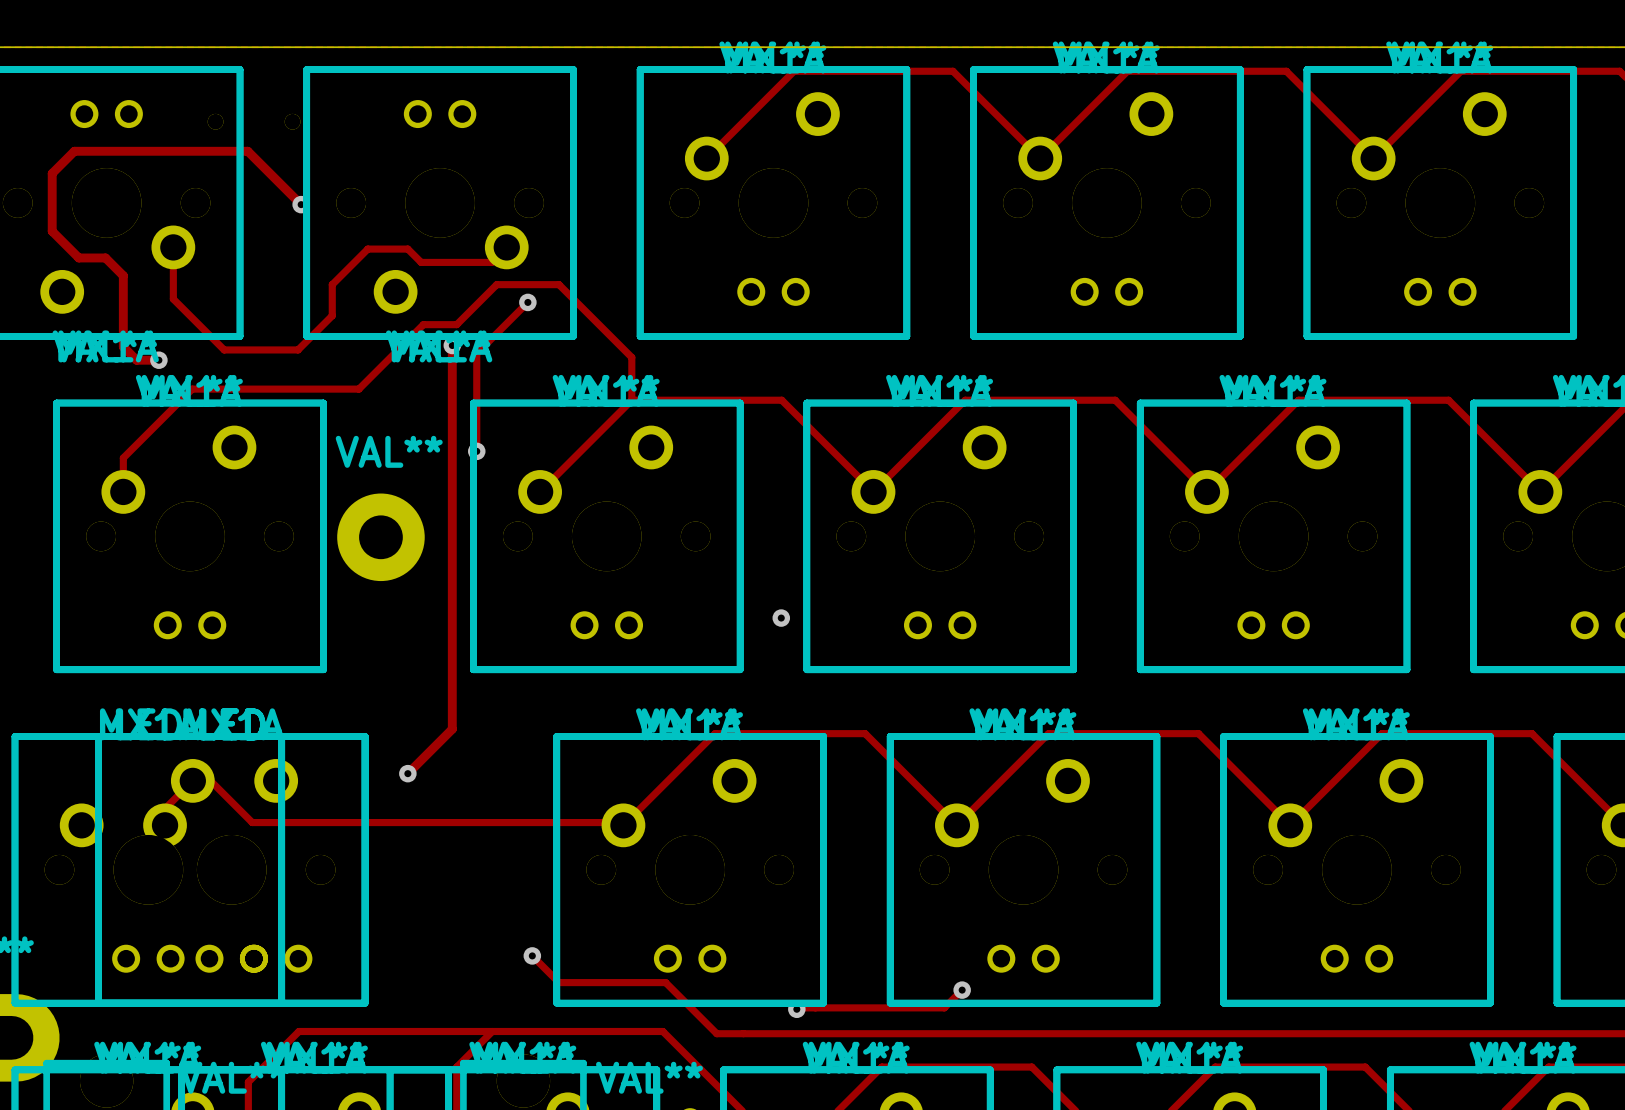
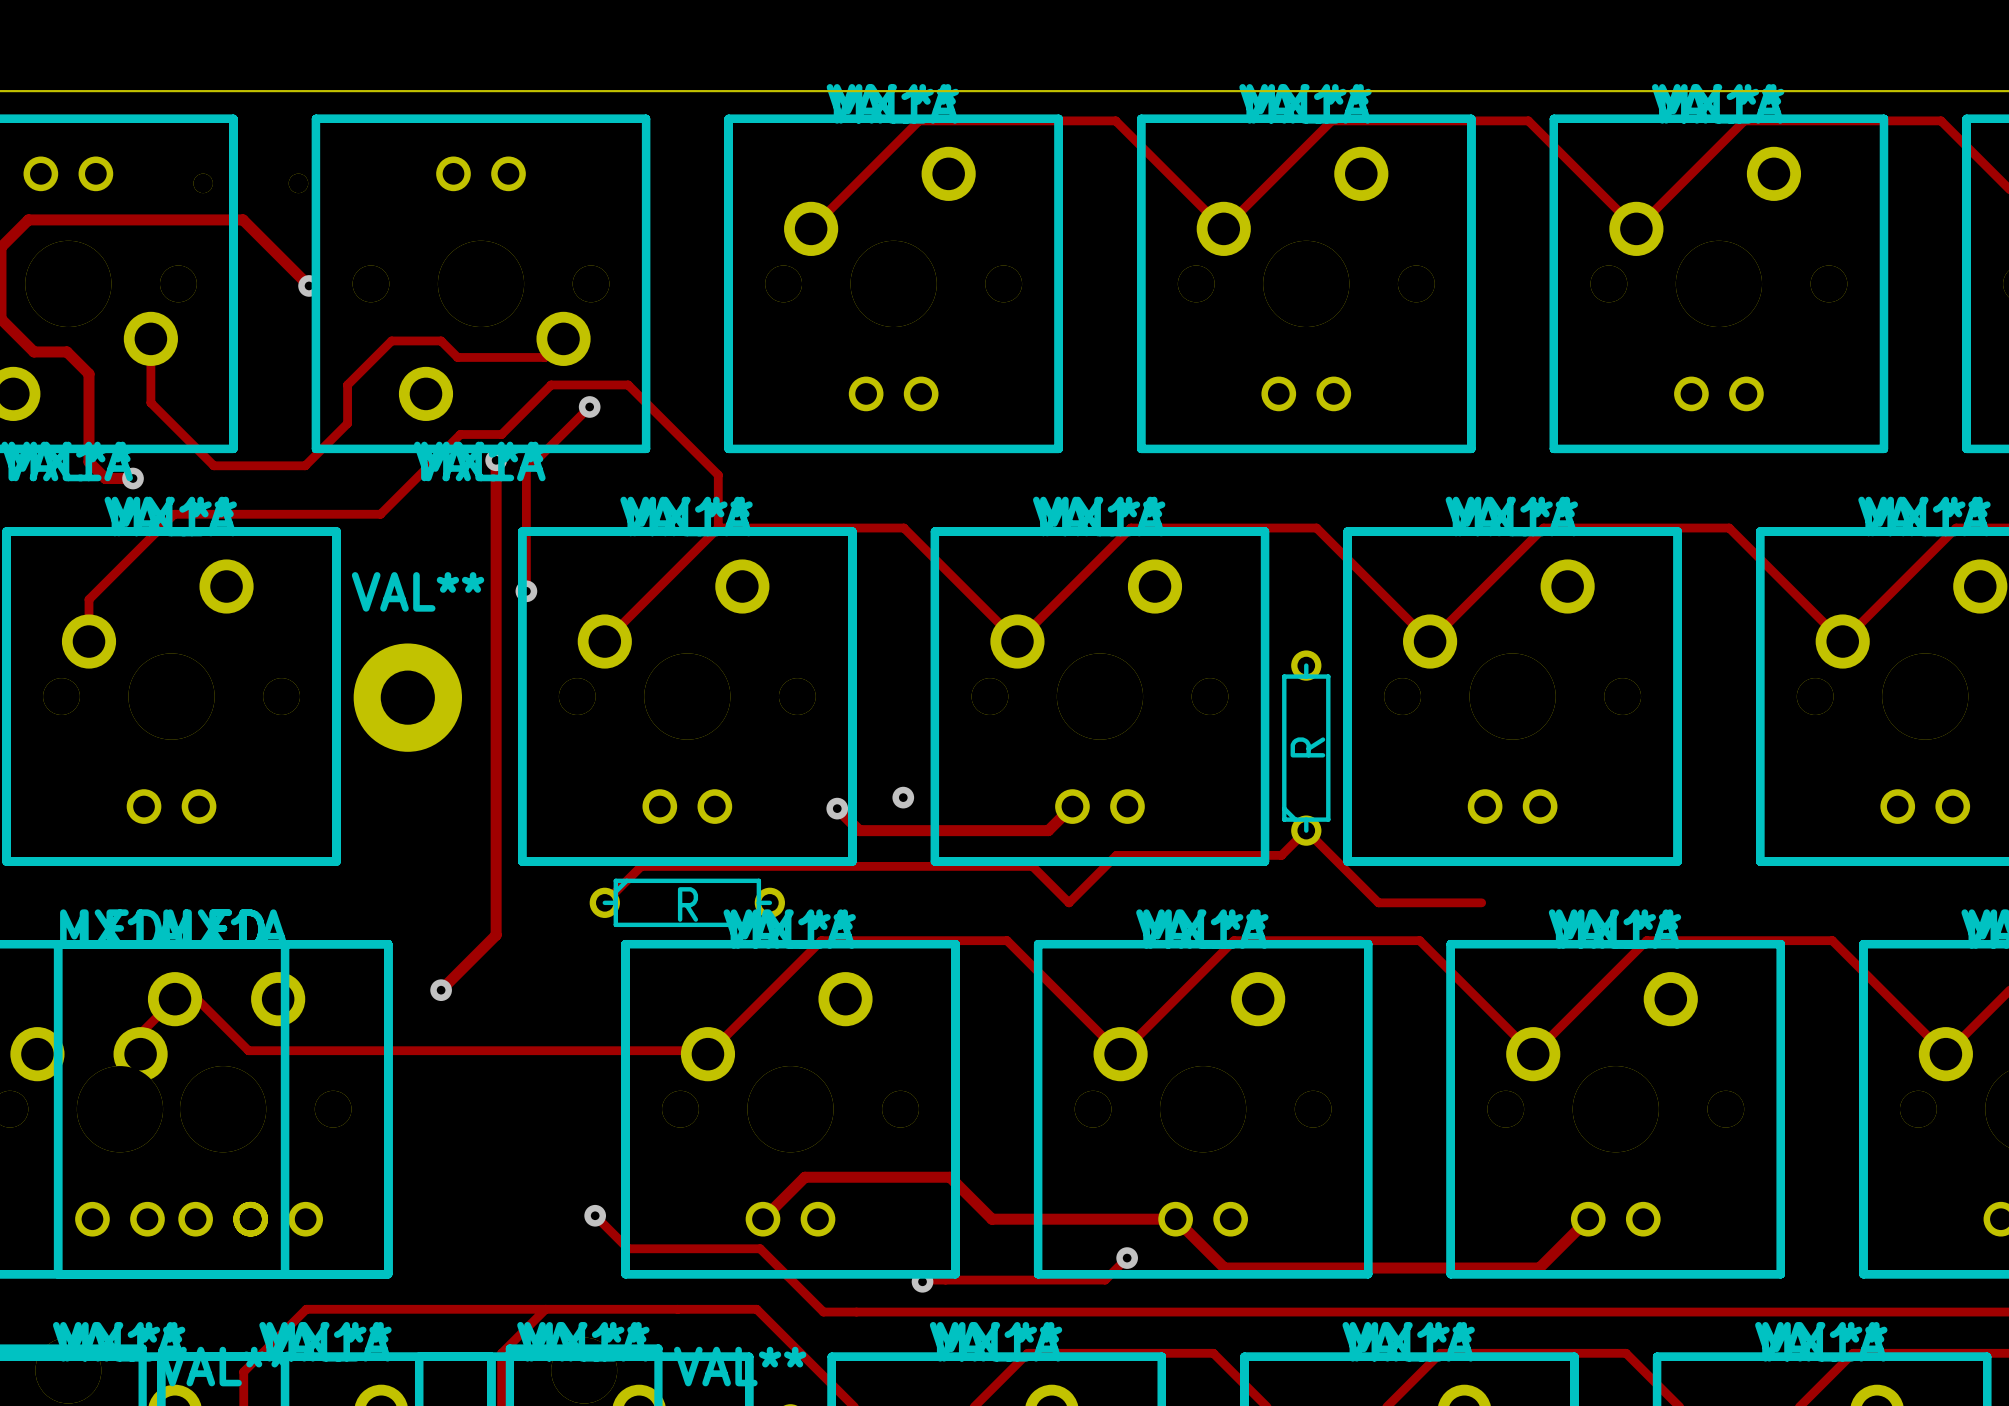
part: none -> R (1306, 748)
track: none -> (1072, 806) (1048, 830) (859, 830) (837, 808)
via: none -> (837, 808)
track: none -> (604, 902) (641, 866) (1032, 866) (1069, 902) (1116, 855) (1281, 855) (1306, 830) (1378, 902) (1481, 902)
part: none -> R (687, 902)
track: none -> (762, 1219) (804, 1177) (950, 1177) (991, 1219) (1175, 1219) (1224, 1268) (1539, 1268) (1588, 1219)

